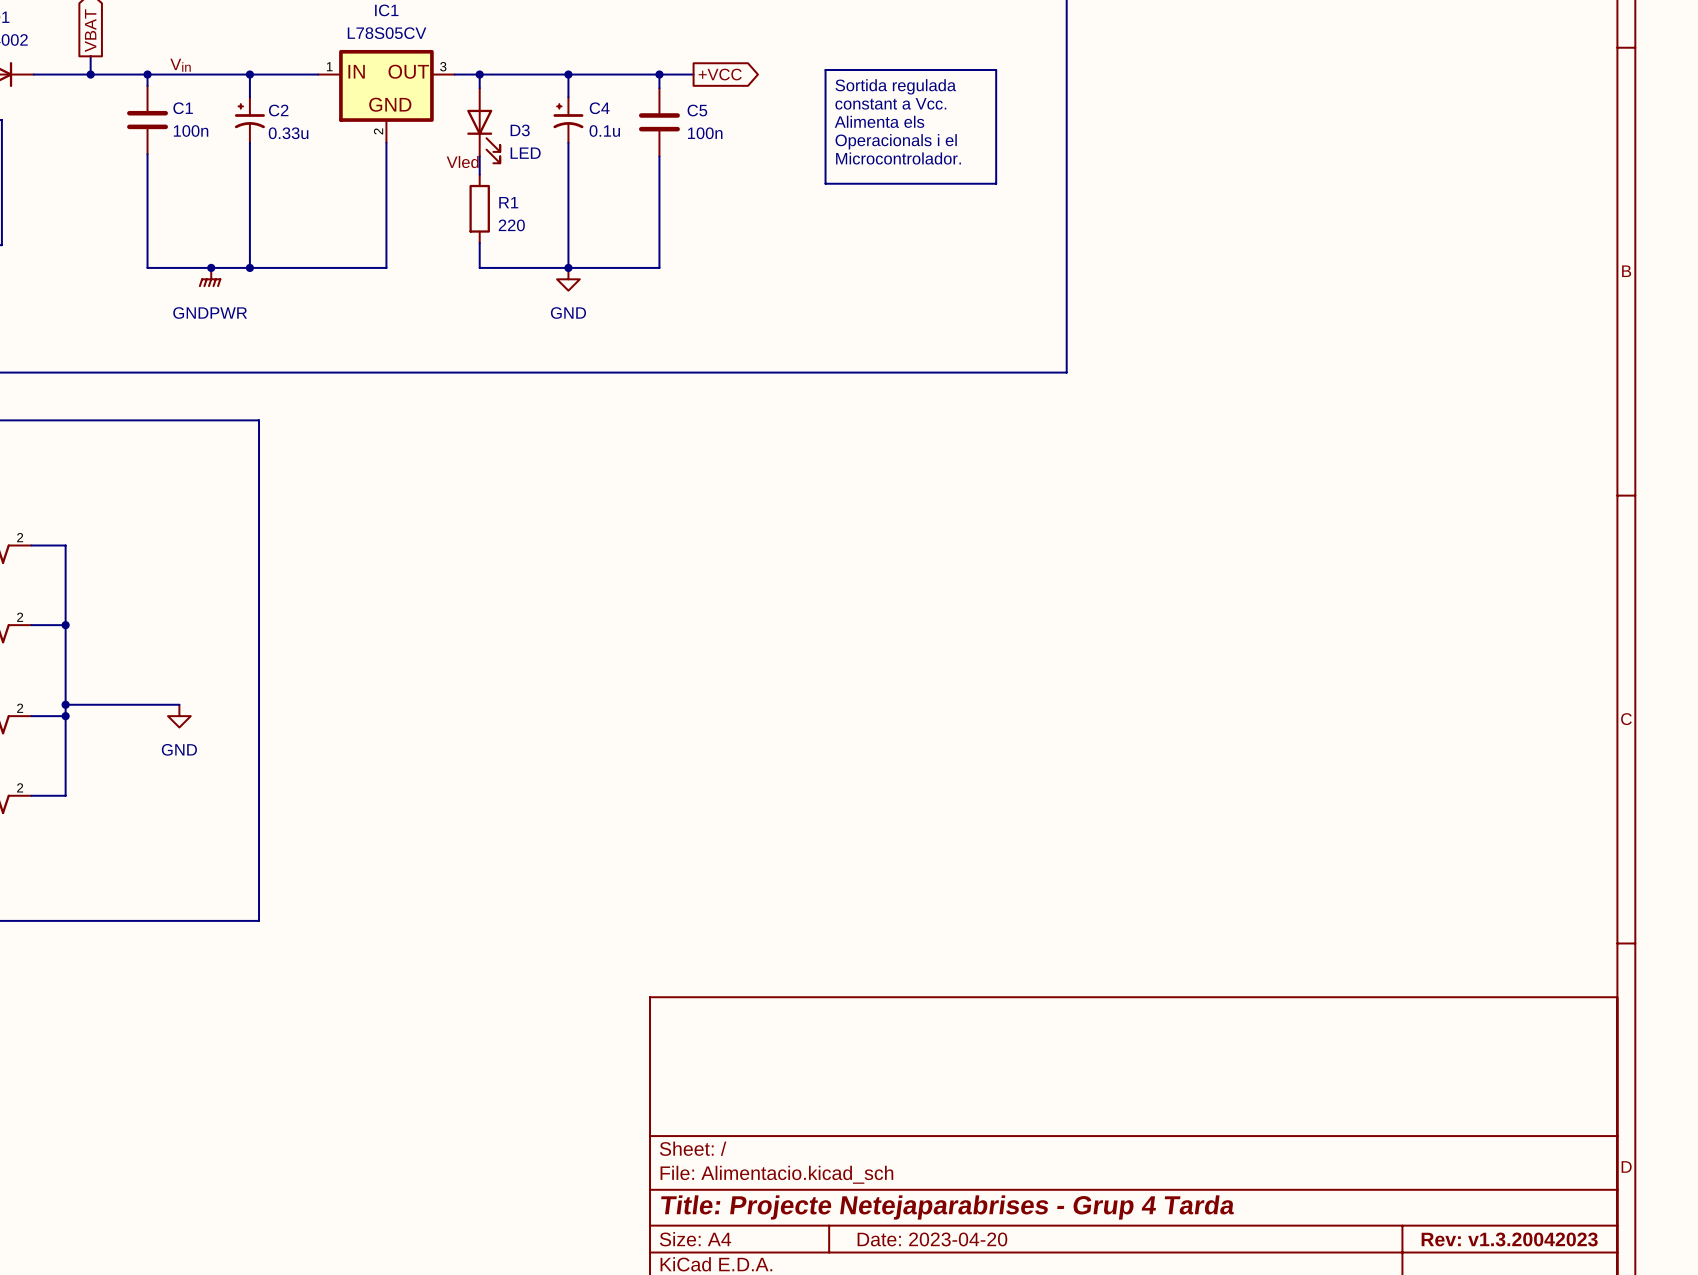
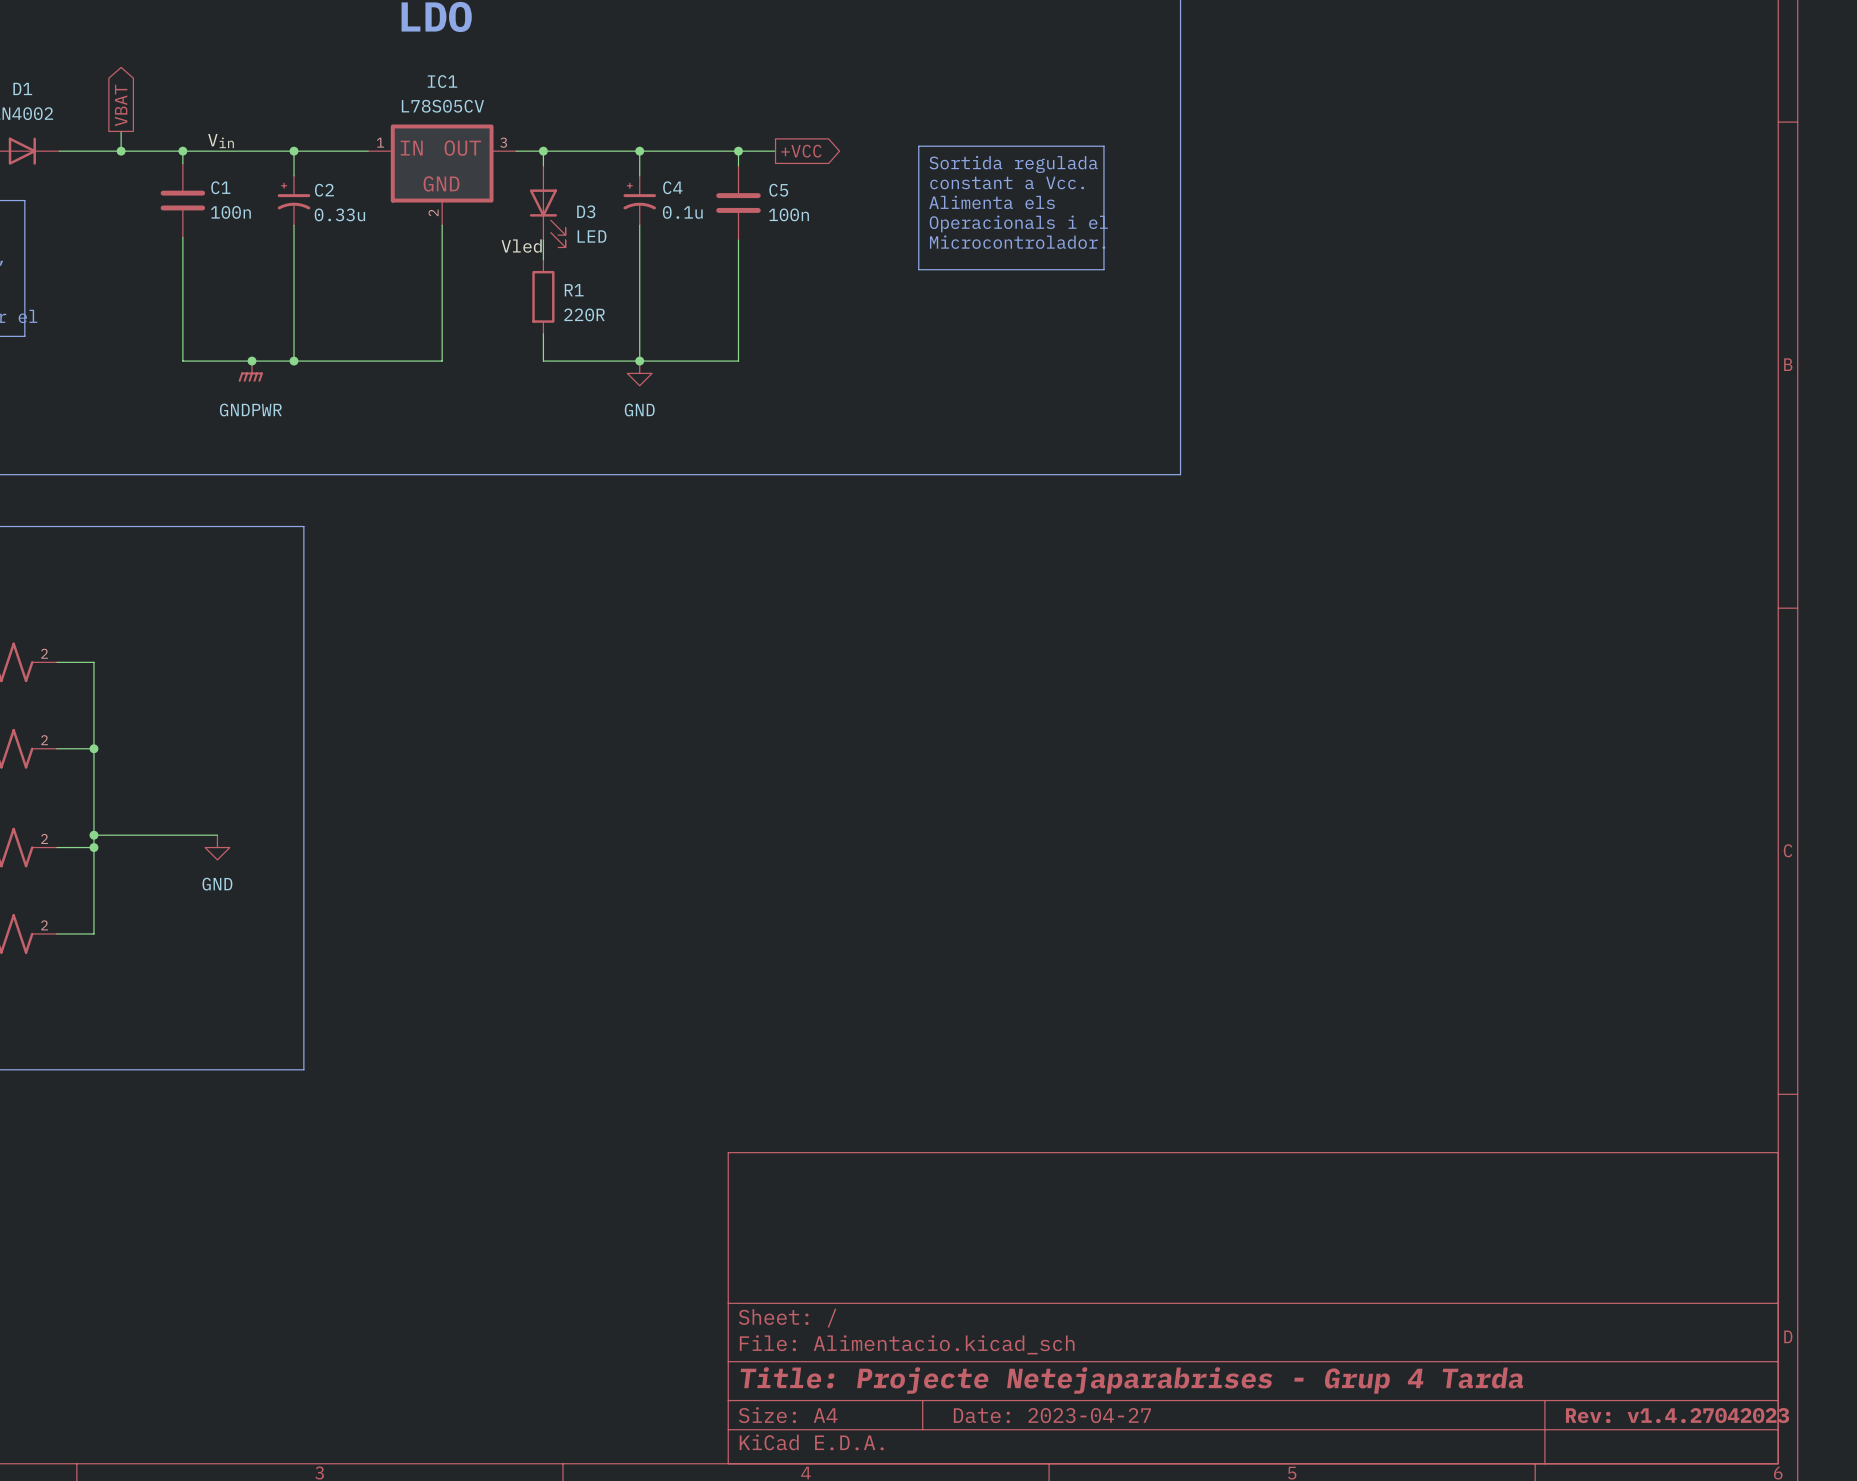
R1 value: 220 (511, 225) -> 220R (584, 314)
title block: Date: 2023-04-20 (932, 1239) -> Date: 2023-04-27 (1052, 1415)
title block: Rev: v1.3.20042023 (1509, 1239) -> Rev: v1.4.27042023 (1677, 1415)

